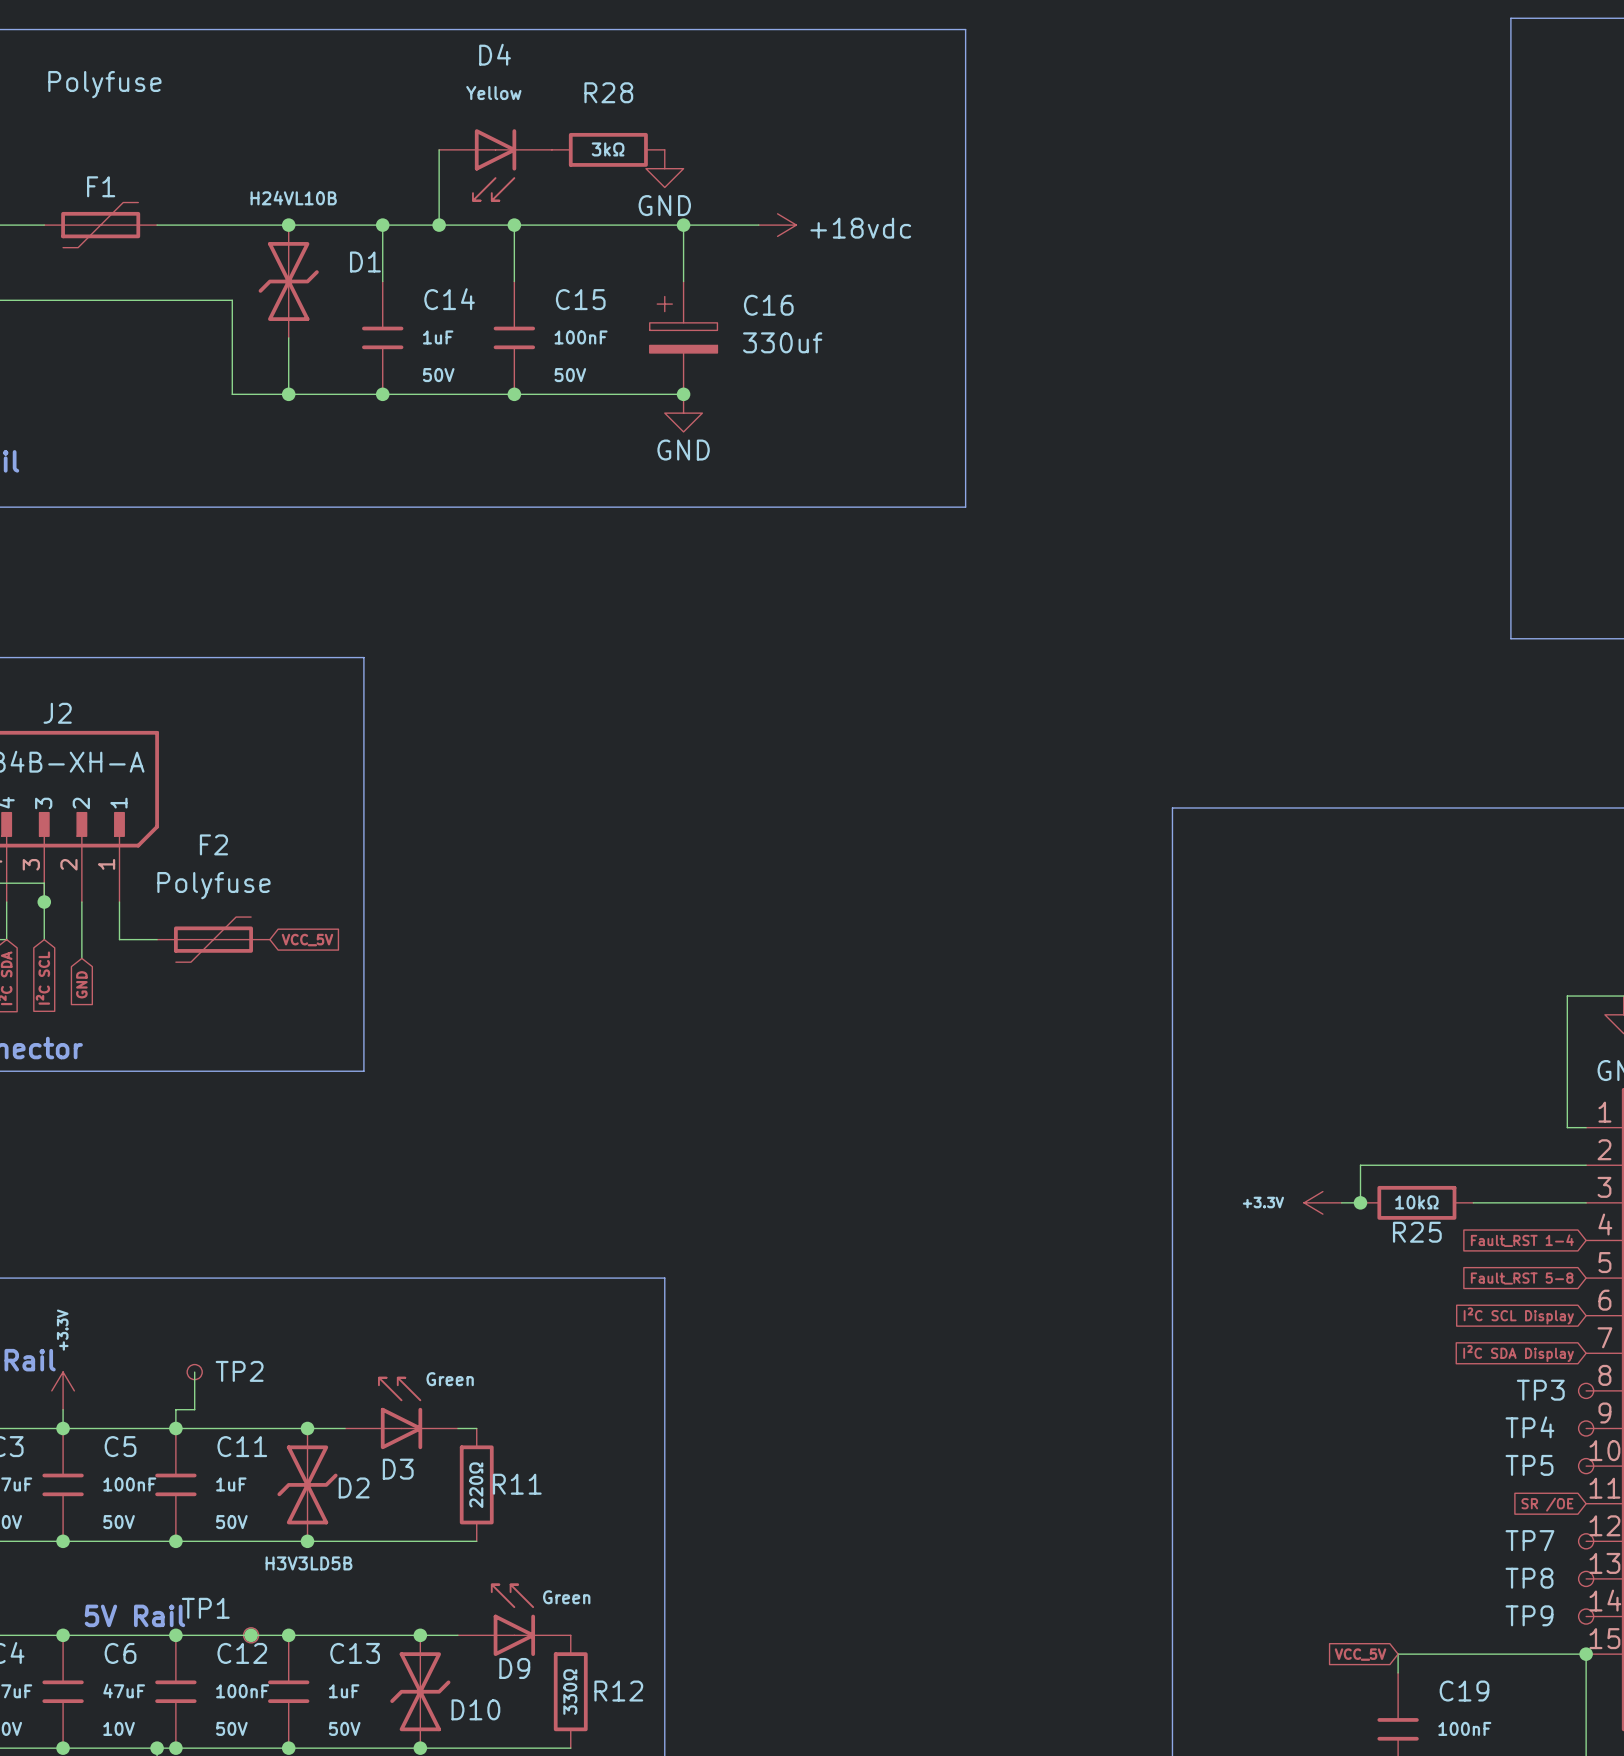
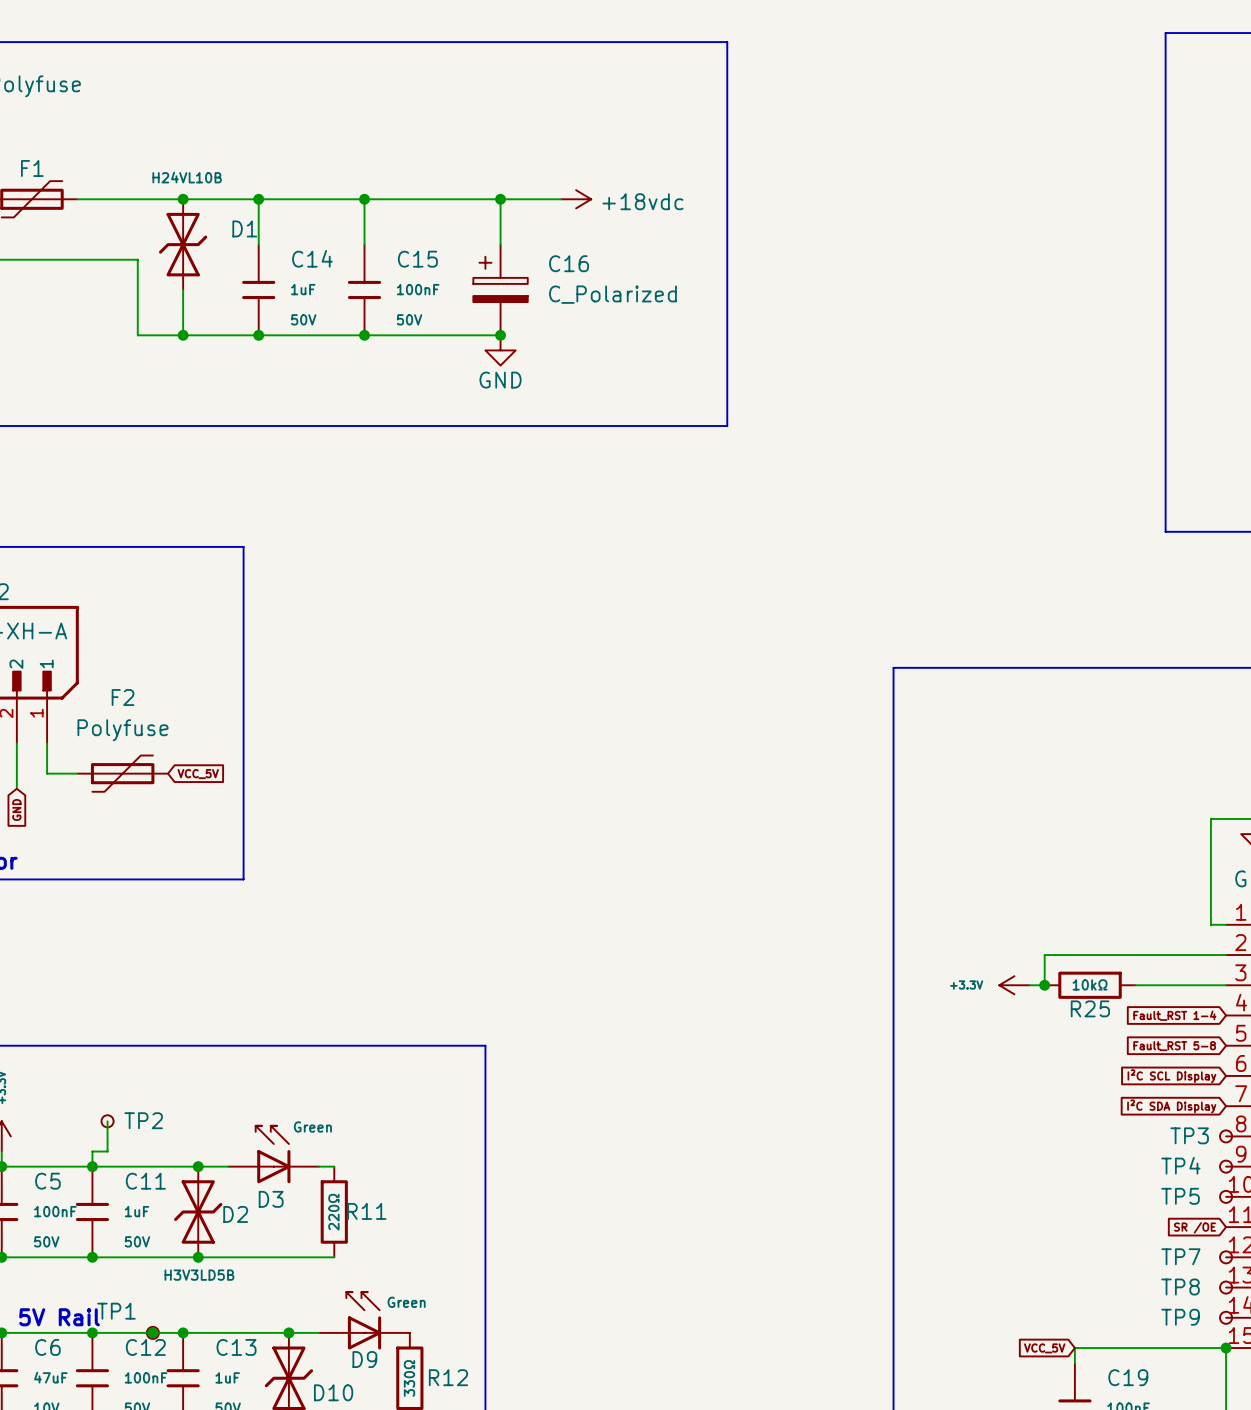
wire: (439, 149) (439, 225) -> none
R28: 3kΩ (608, 149) -> none
D4: Yellow (495, 165) -> none
power symbol: GND (664, 168) -> none
junction: (439, 225) -> none
C16 value: 330uf (782, 342) -> C_Polarized (612, 294)

